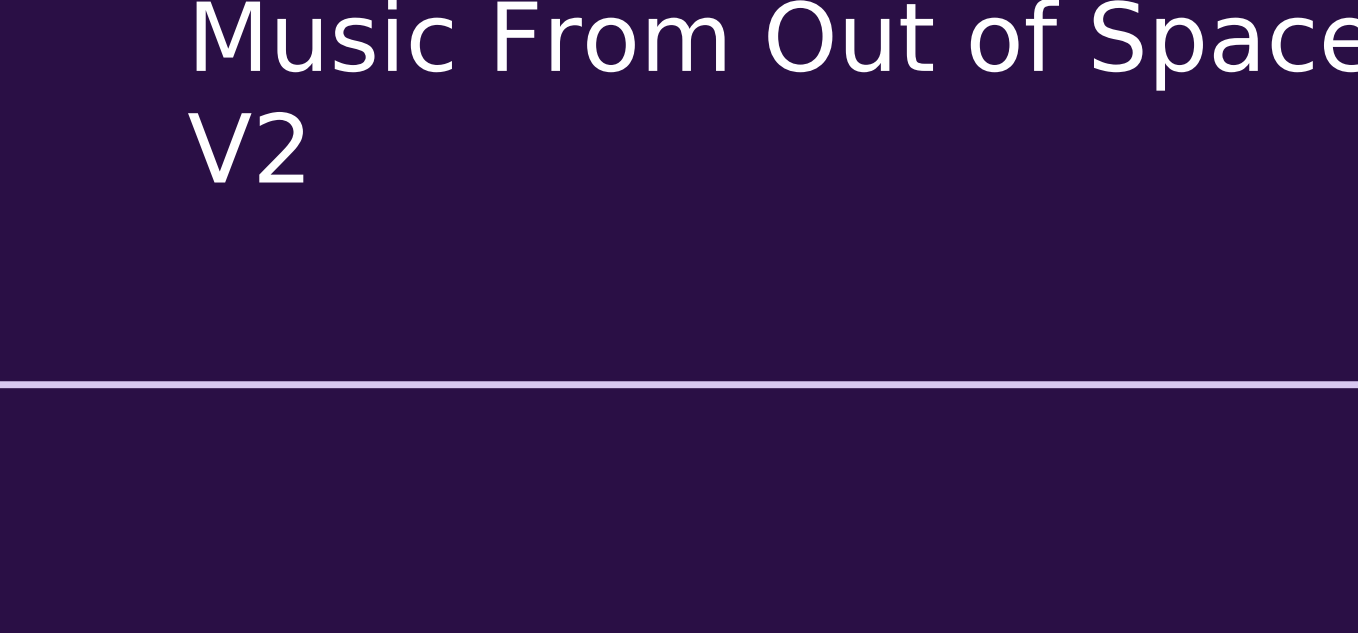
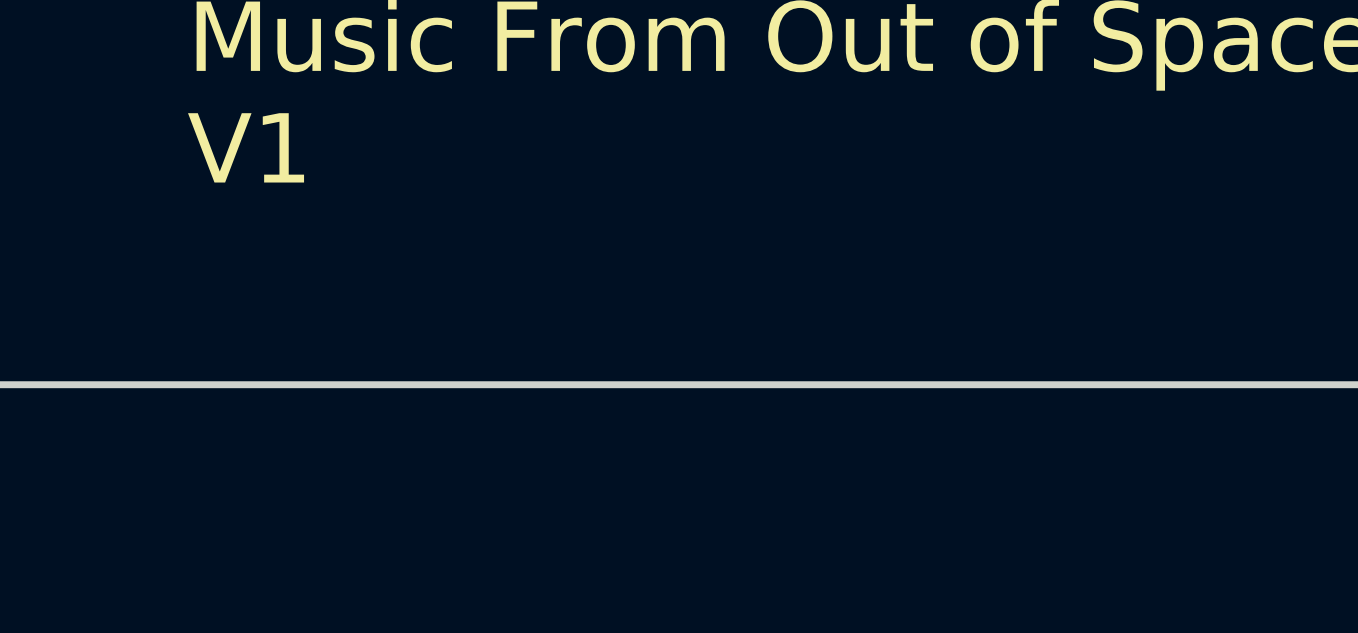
text: V2 (245, 147) -> V1 (246, 147)

